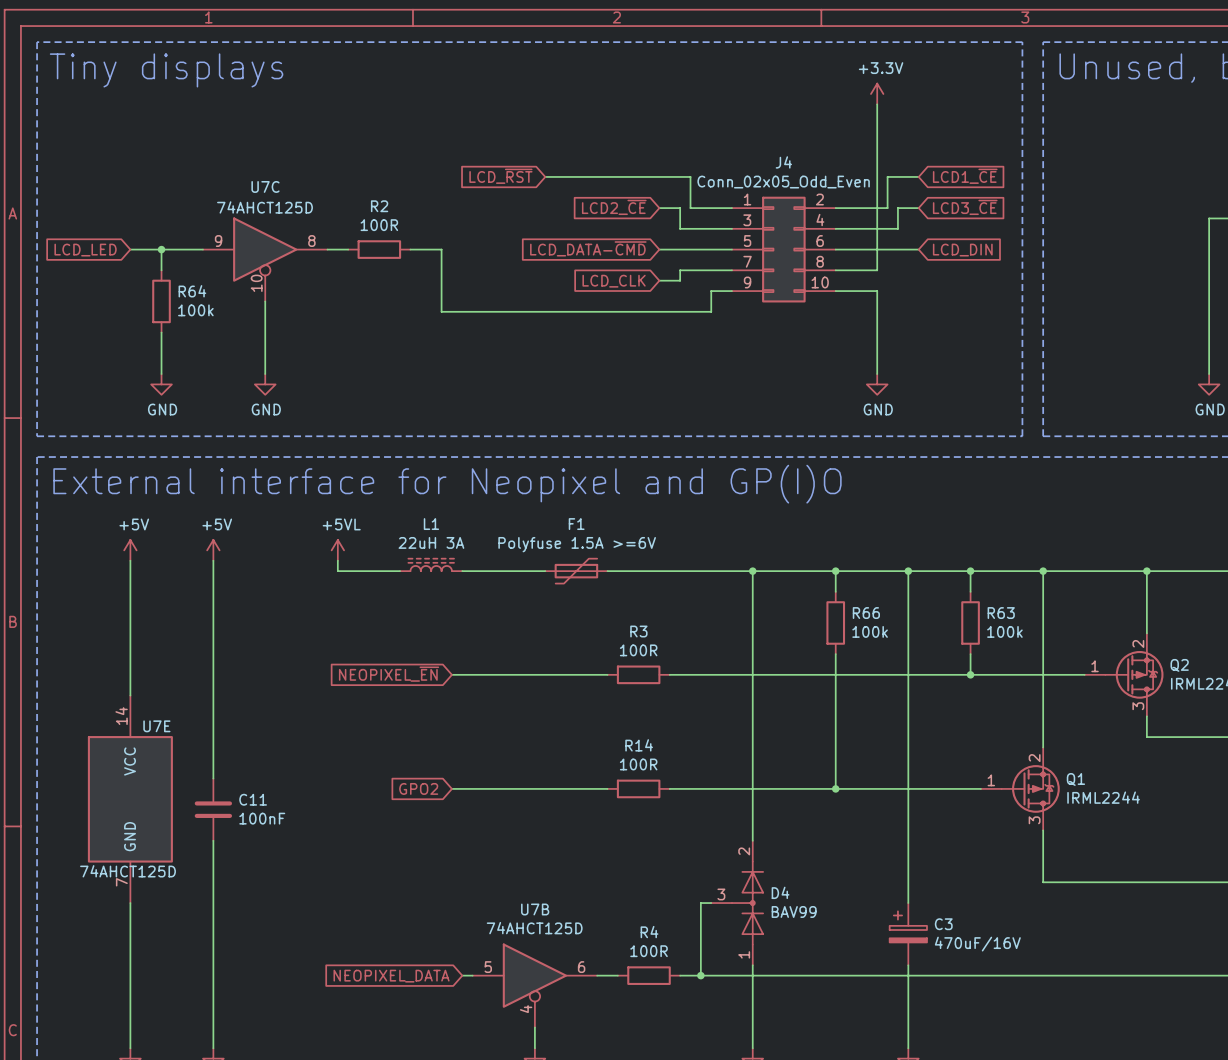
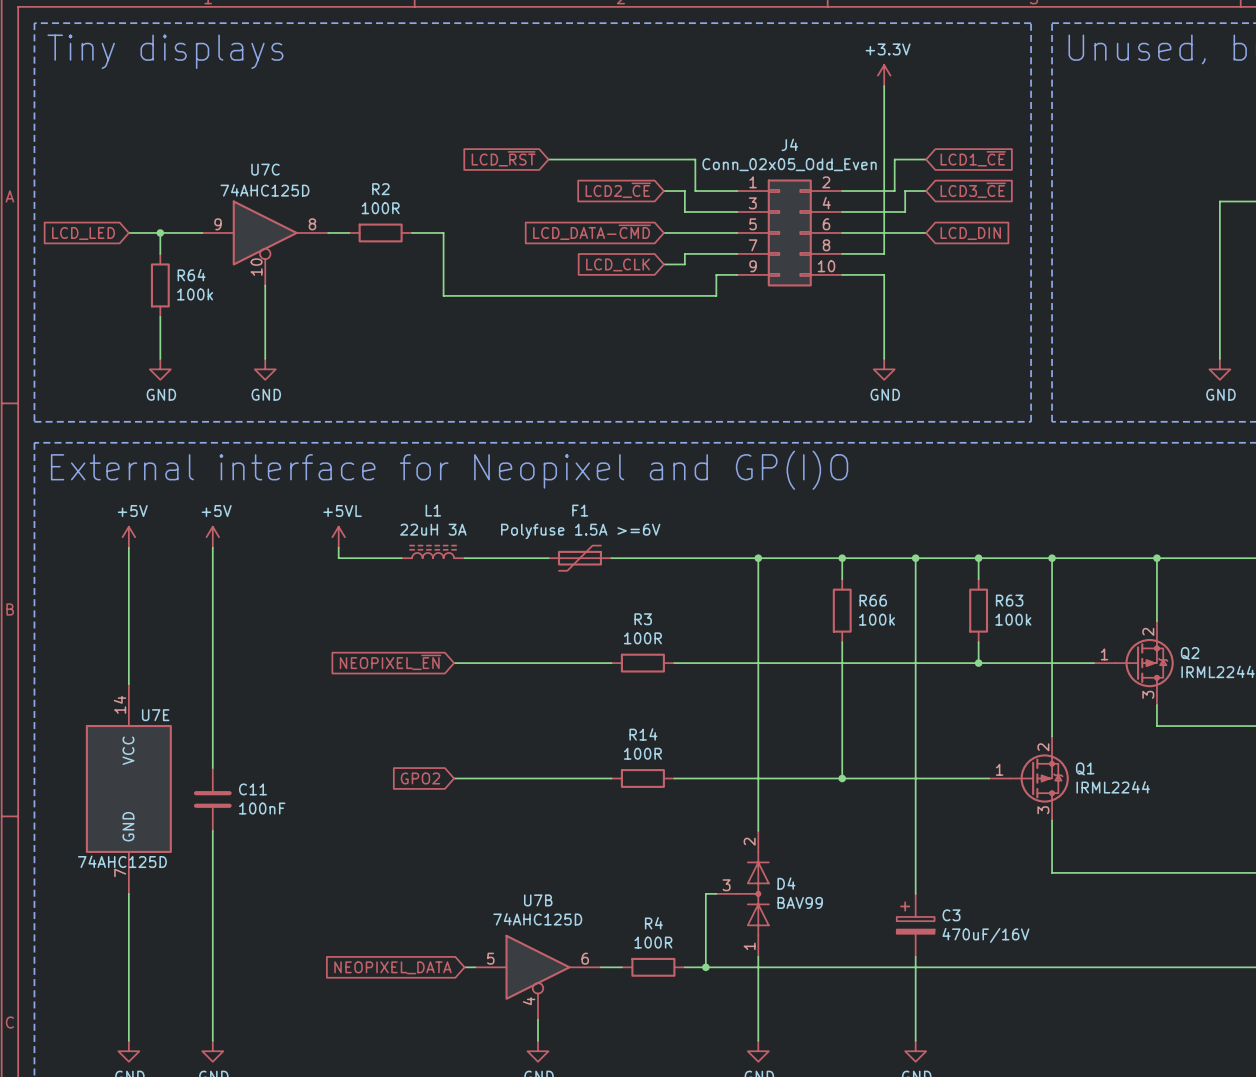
U7C value: 74AHCT125D (264, 207) -> 74AHC125D (264, 190)
U7E value: 74AHCT125D (128, 871) -> 74AHC125D (122, 861)
U7B value: 74AHCT125D (534, 928) -> 74AHC125D (537, 919)

